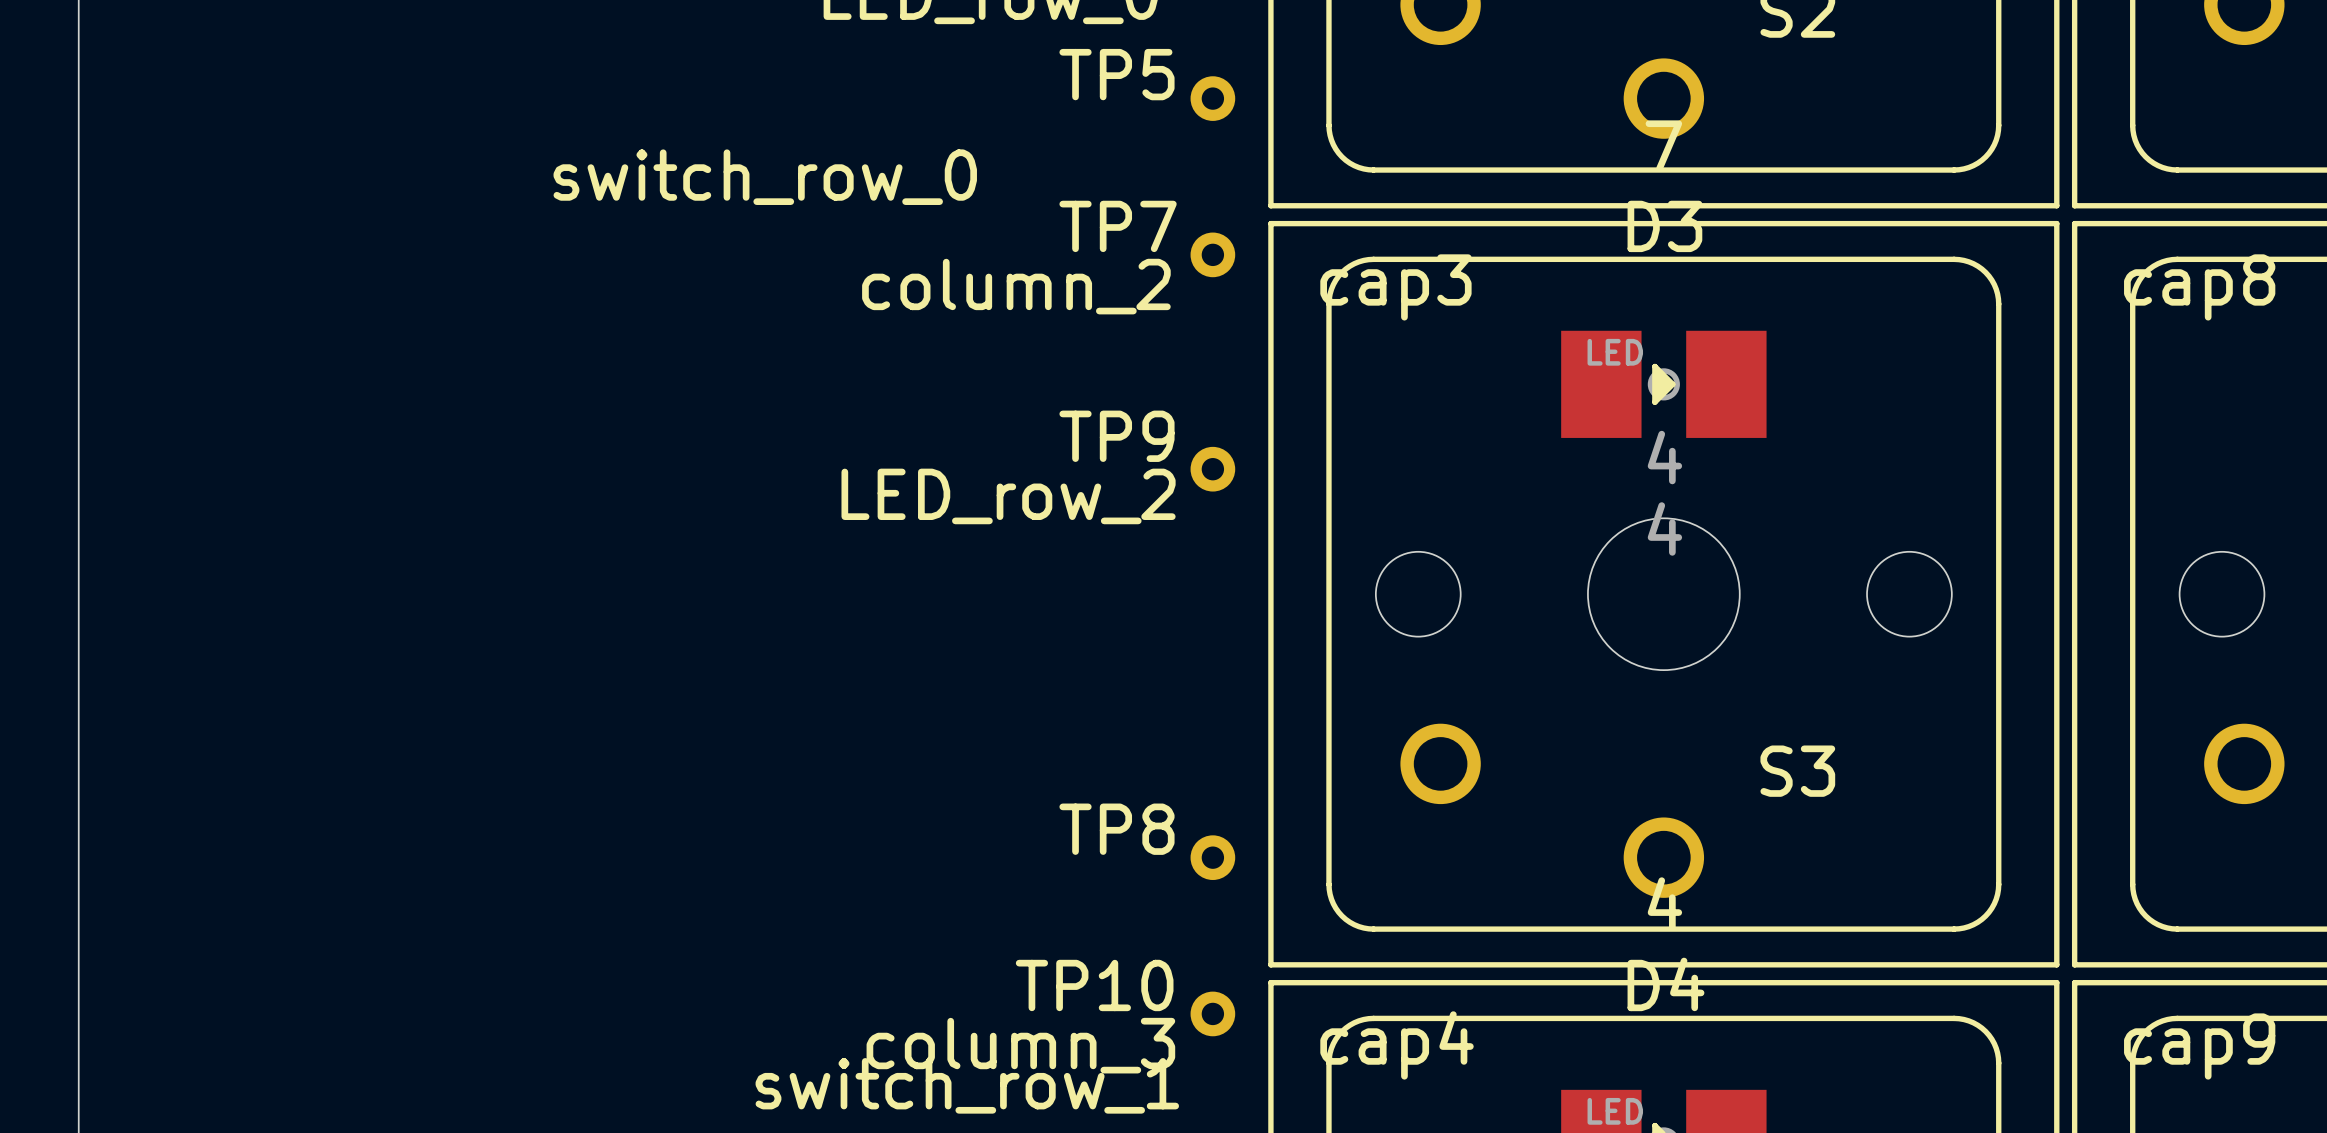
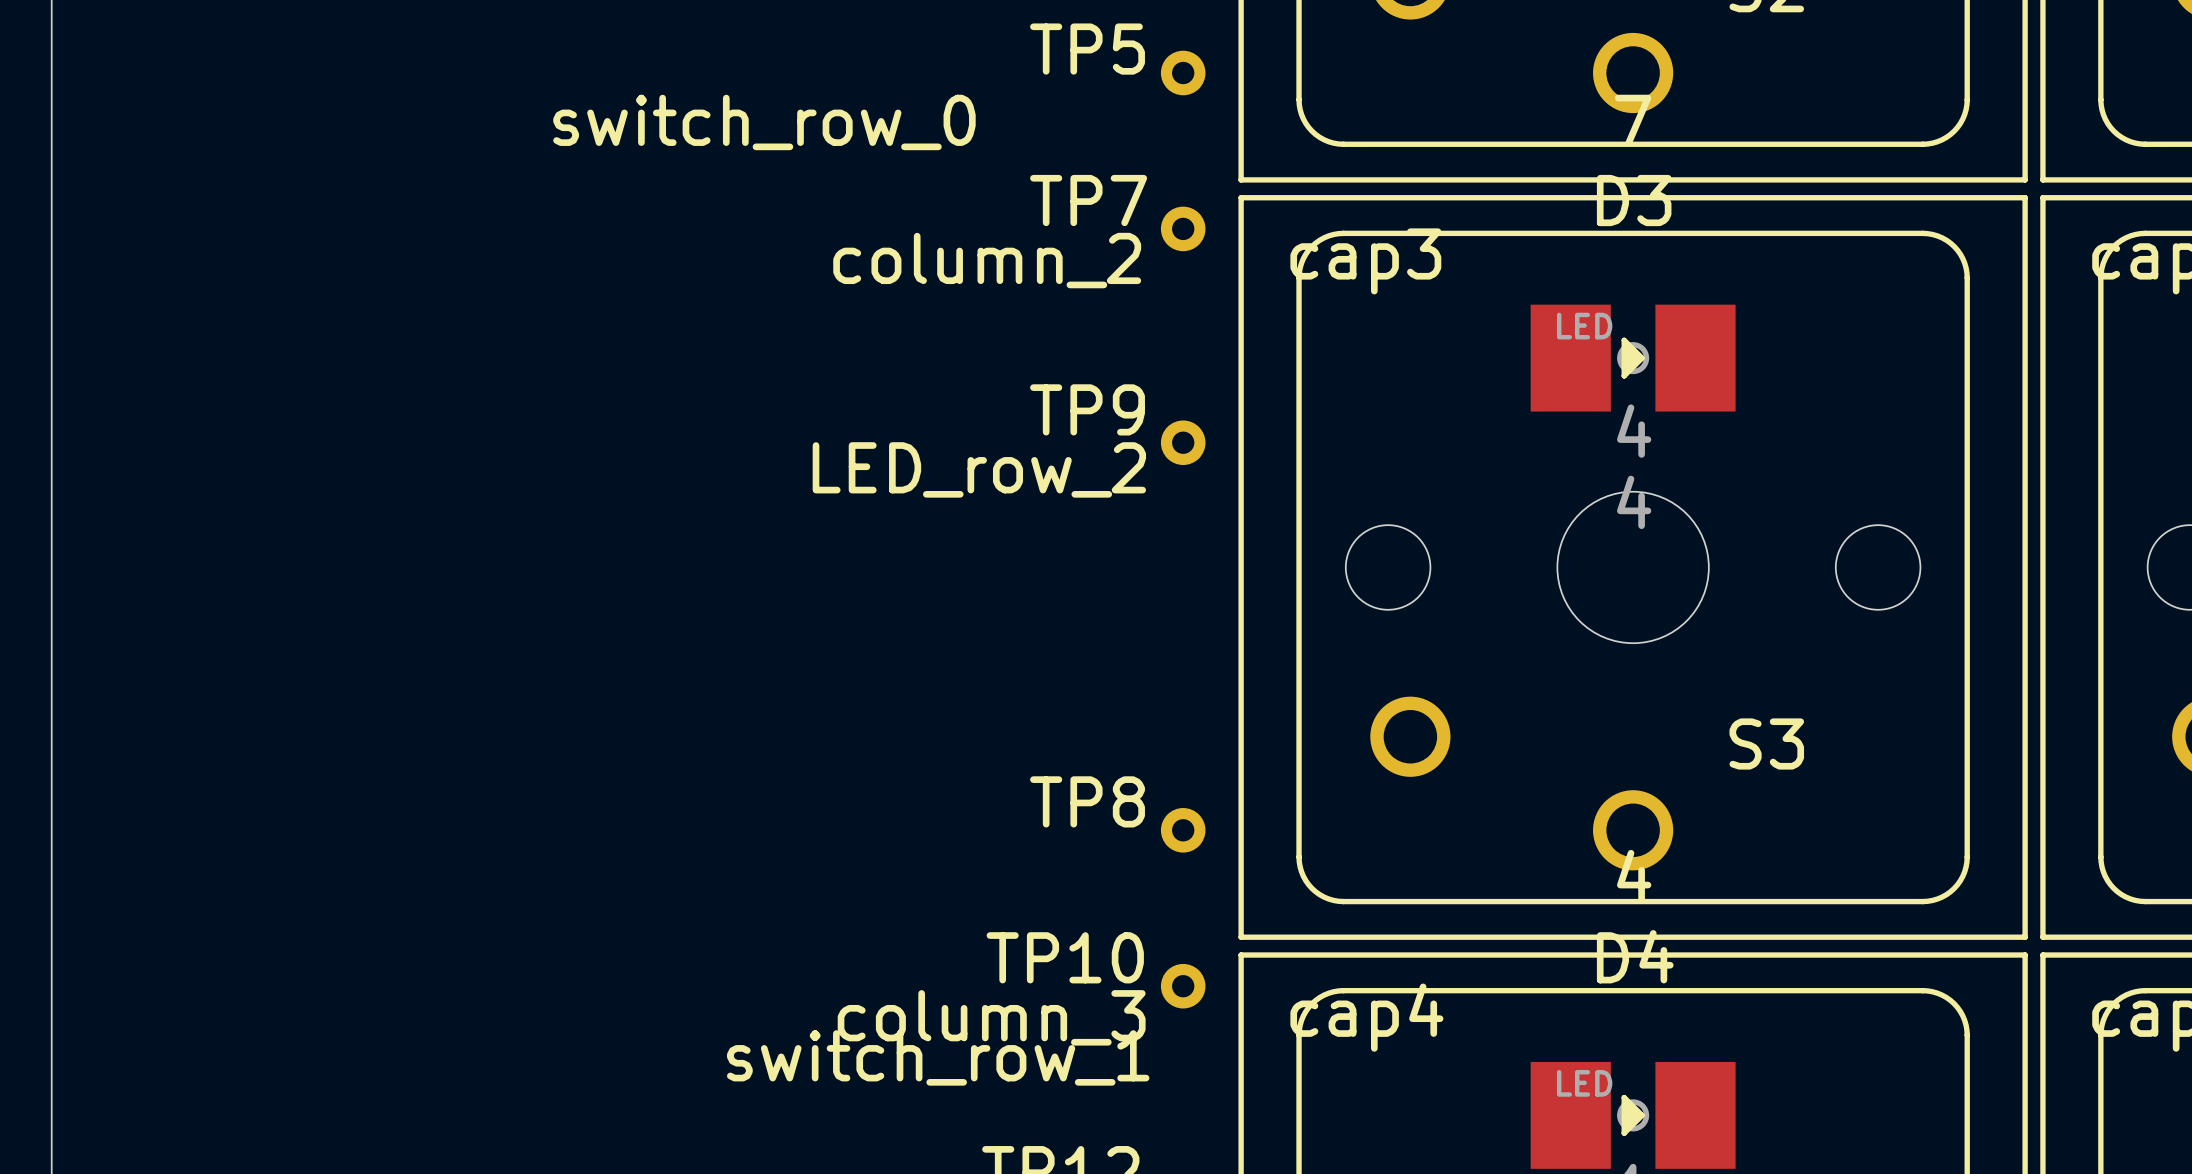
part value position: switch_row_0 (765, 177) -> switch_row_0 (764, 122)

